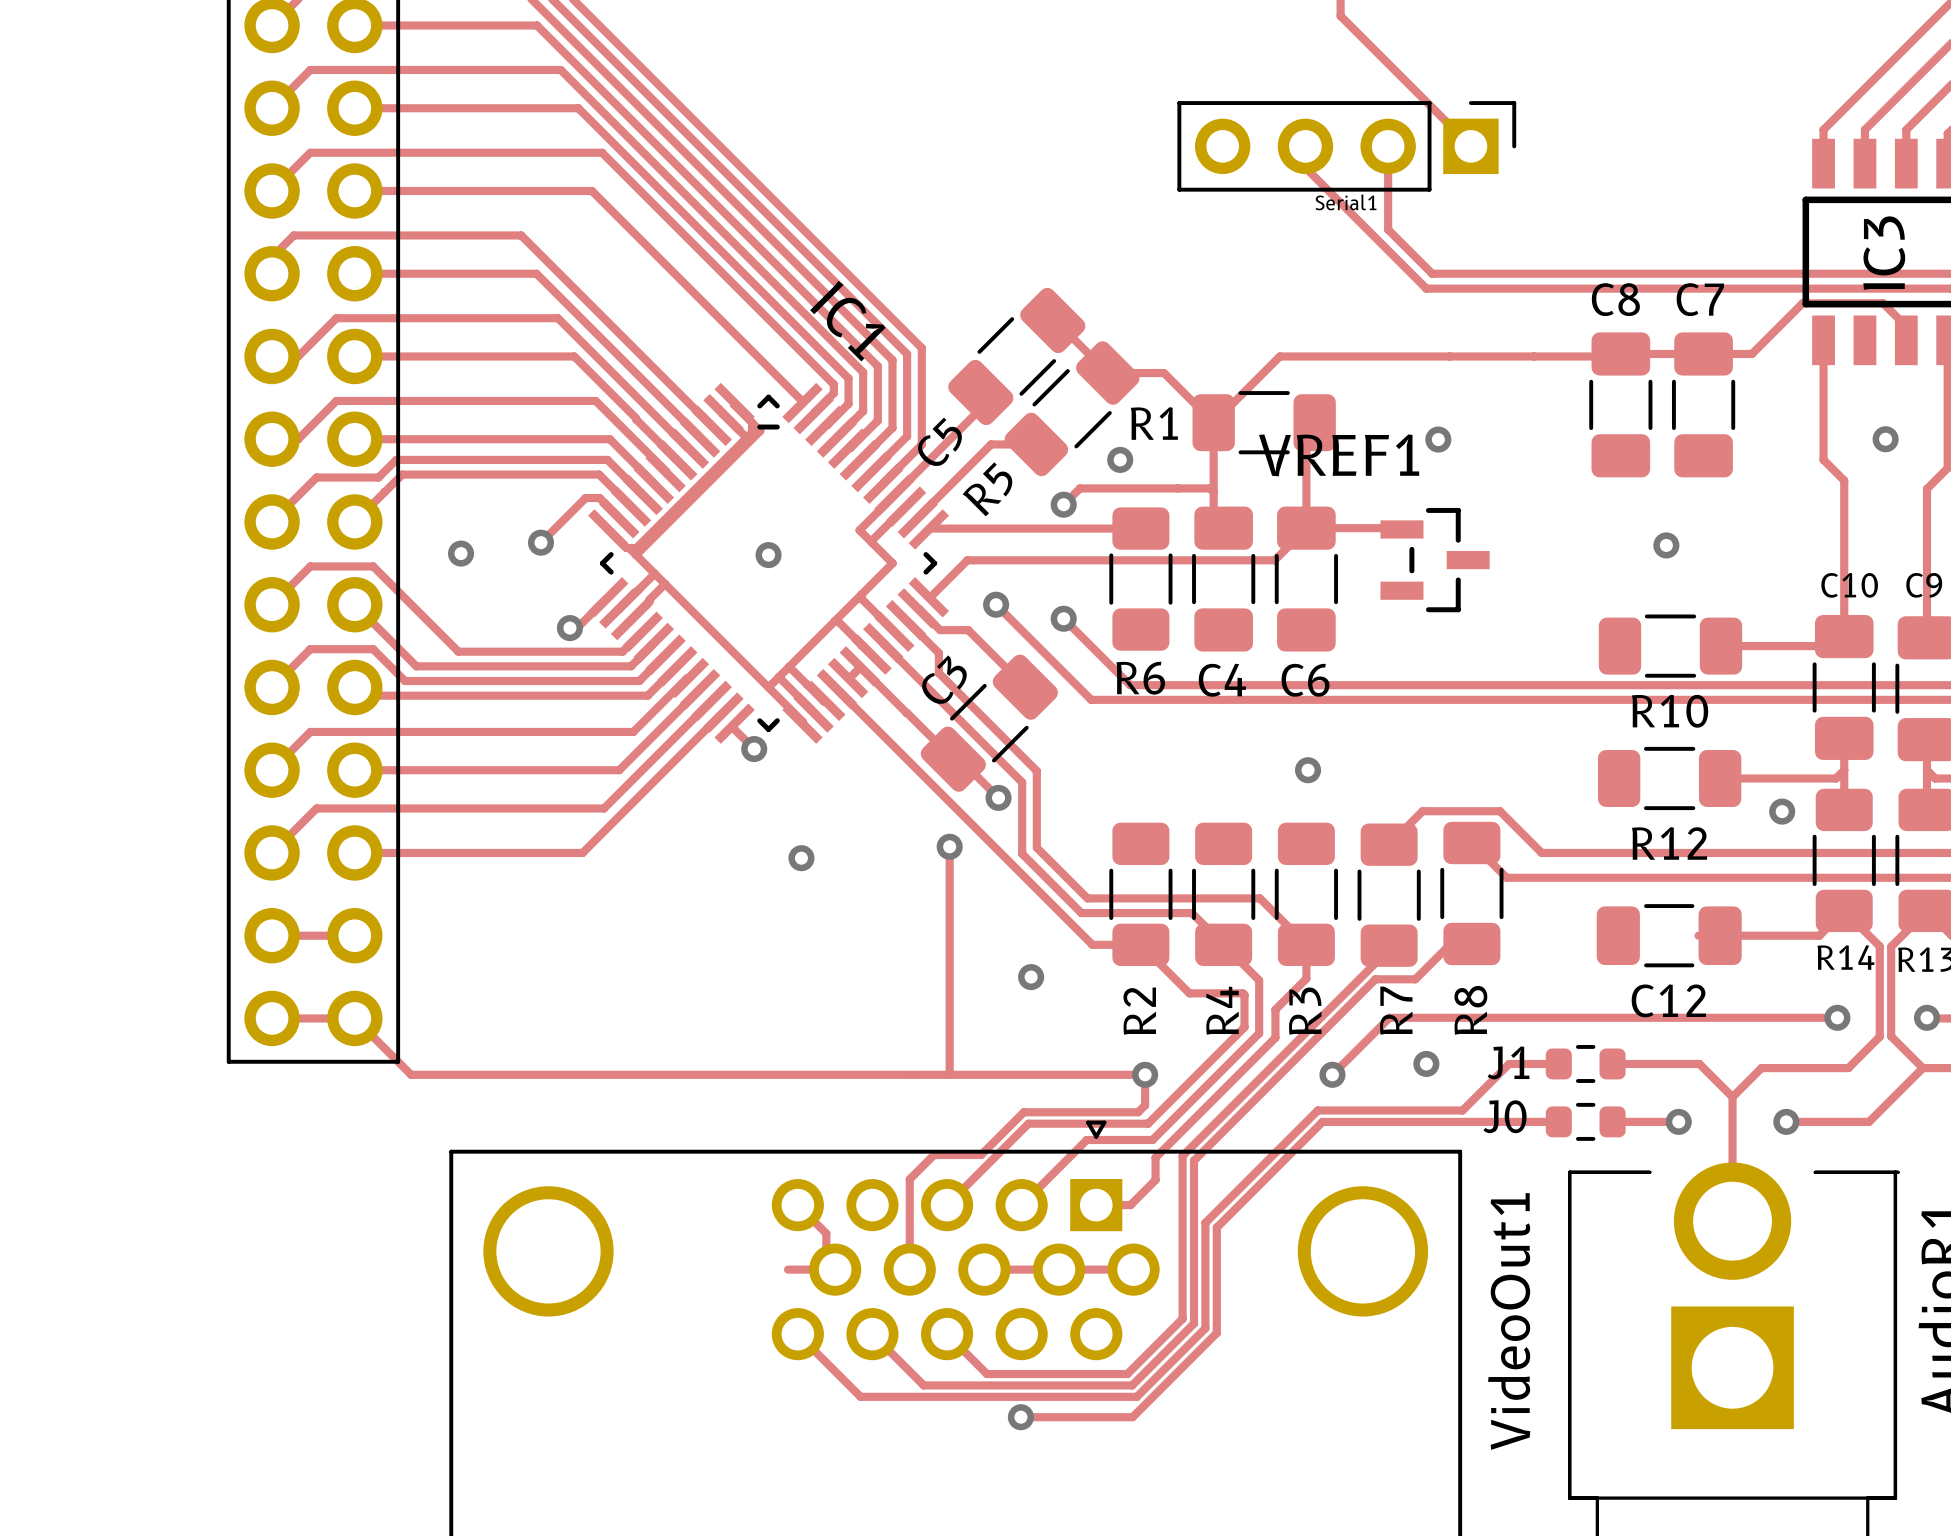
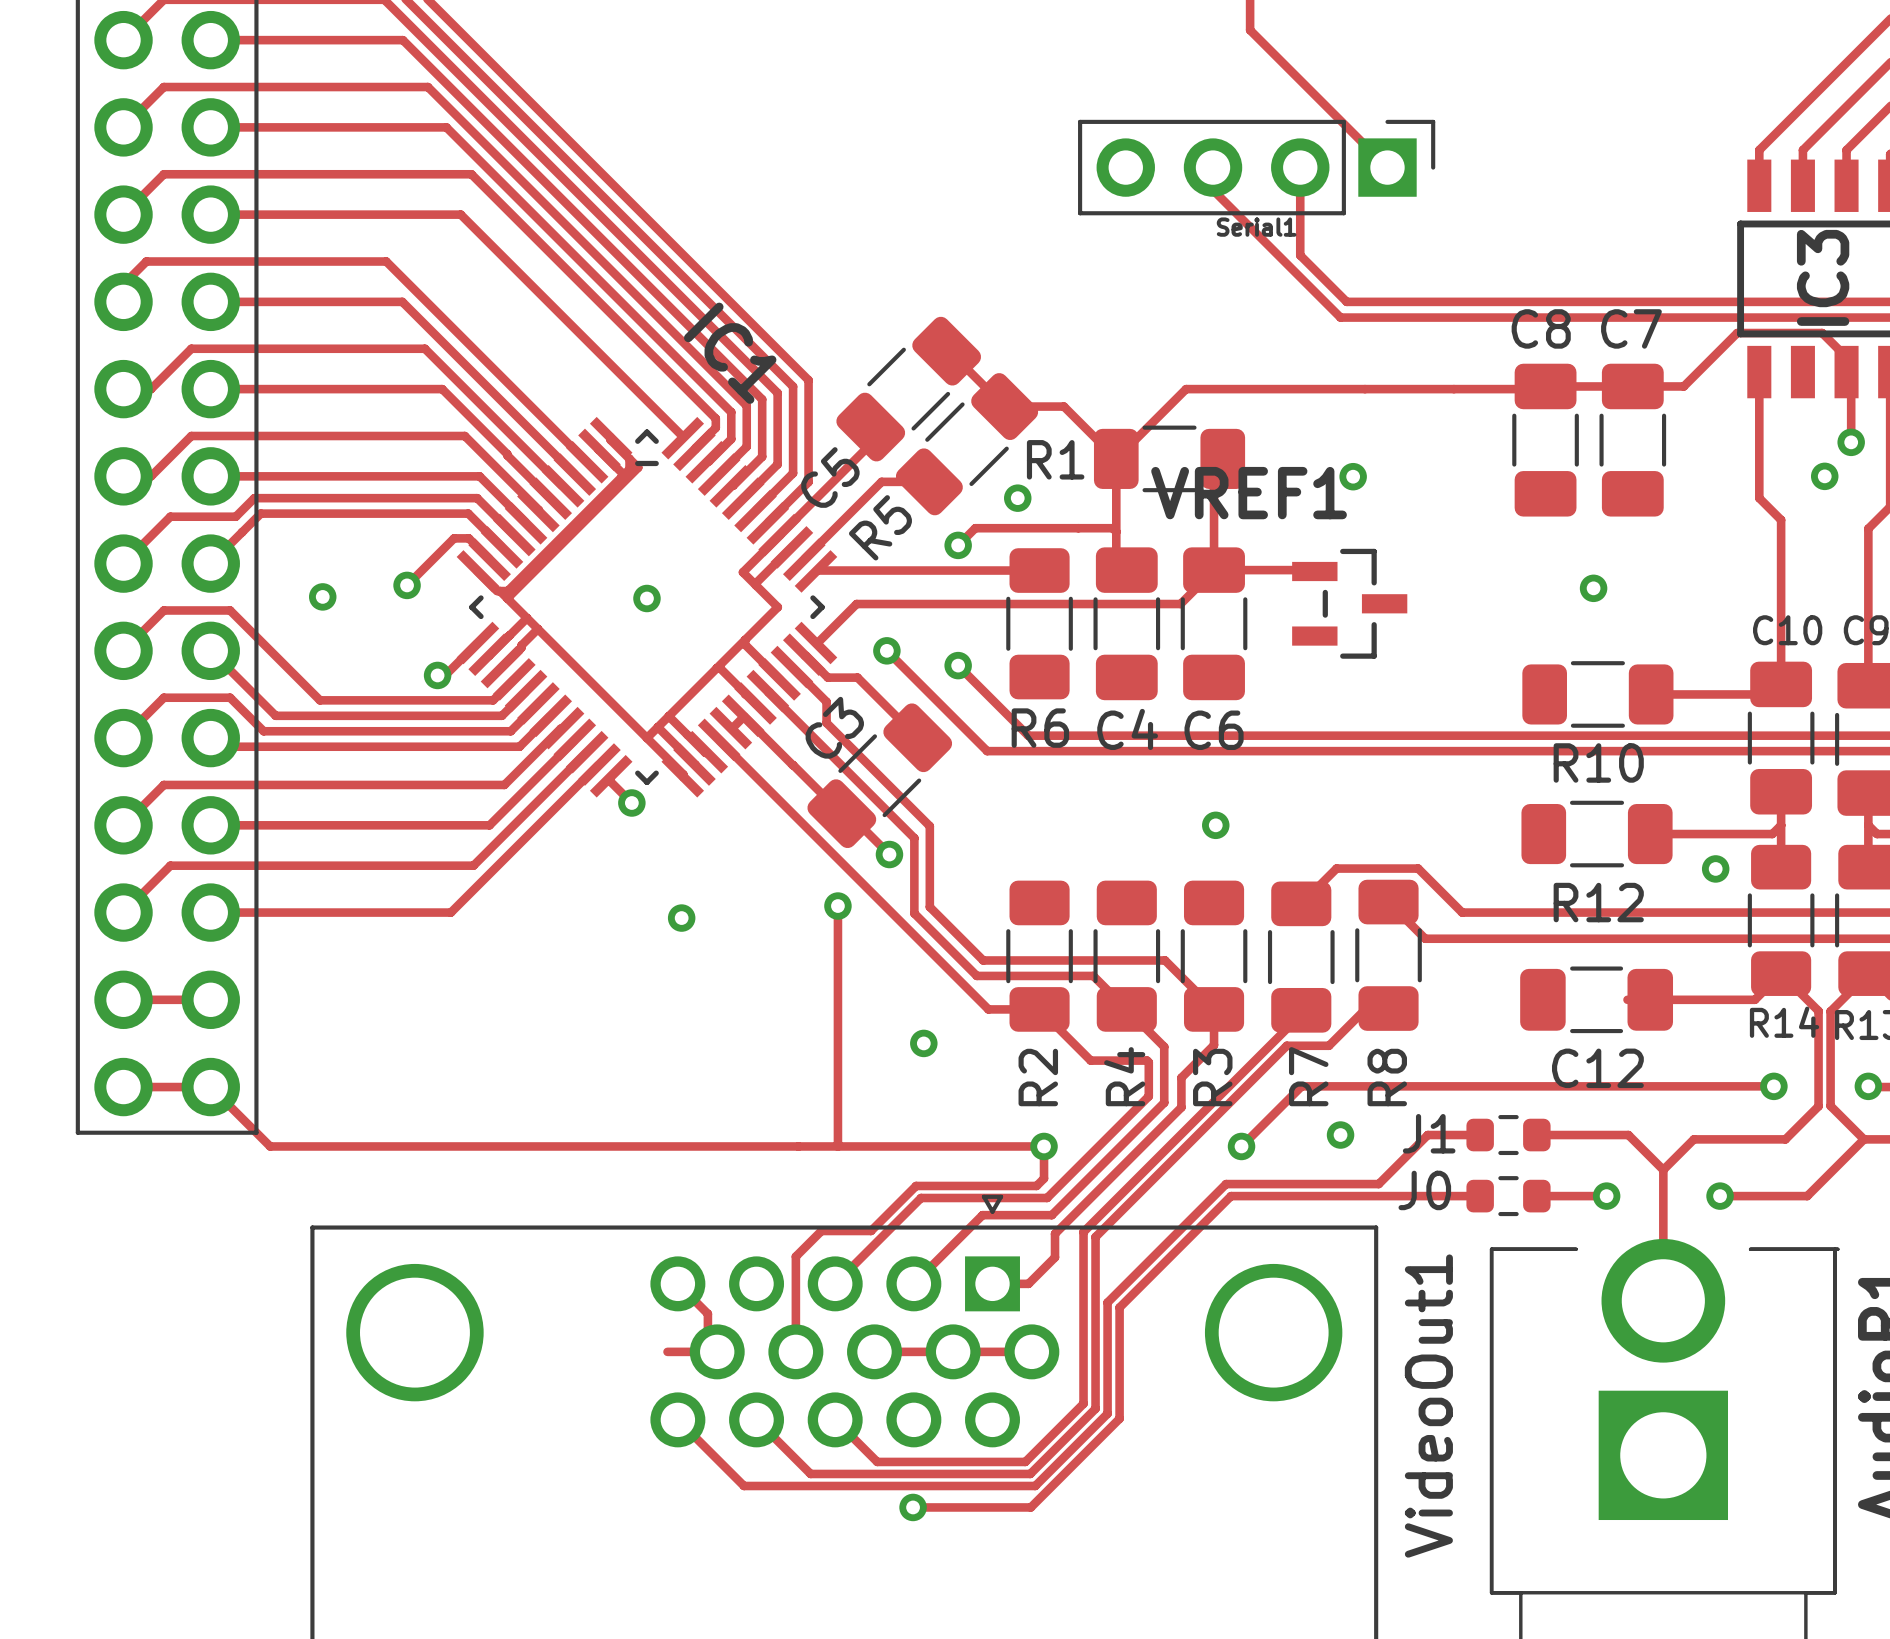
track: none -> (1851, 376) (1851, 442)
via: none -> (1851, 442)

